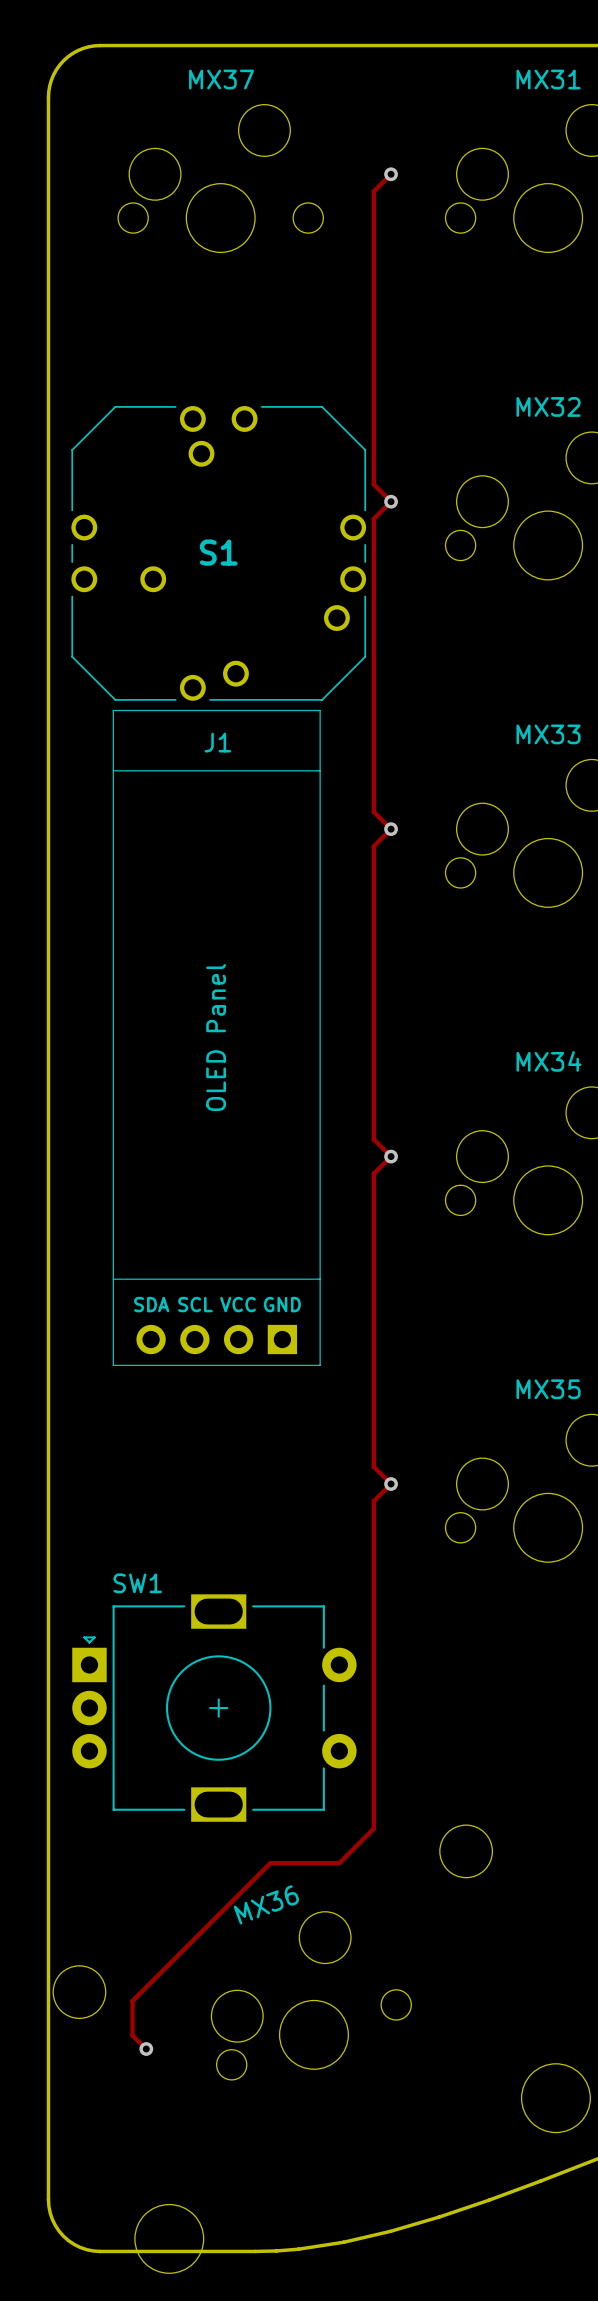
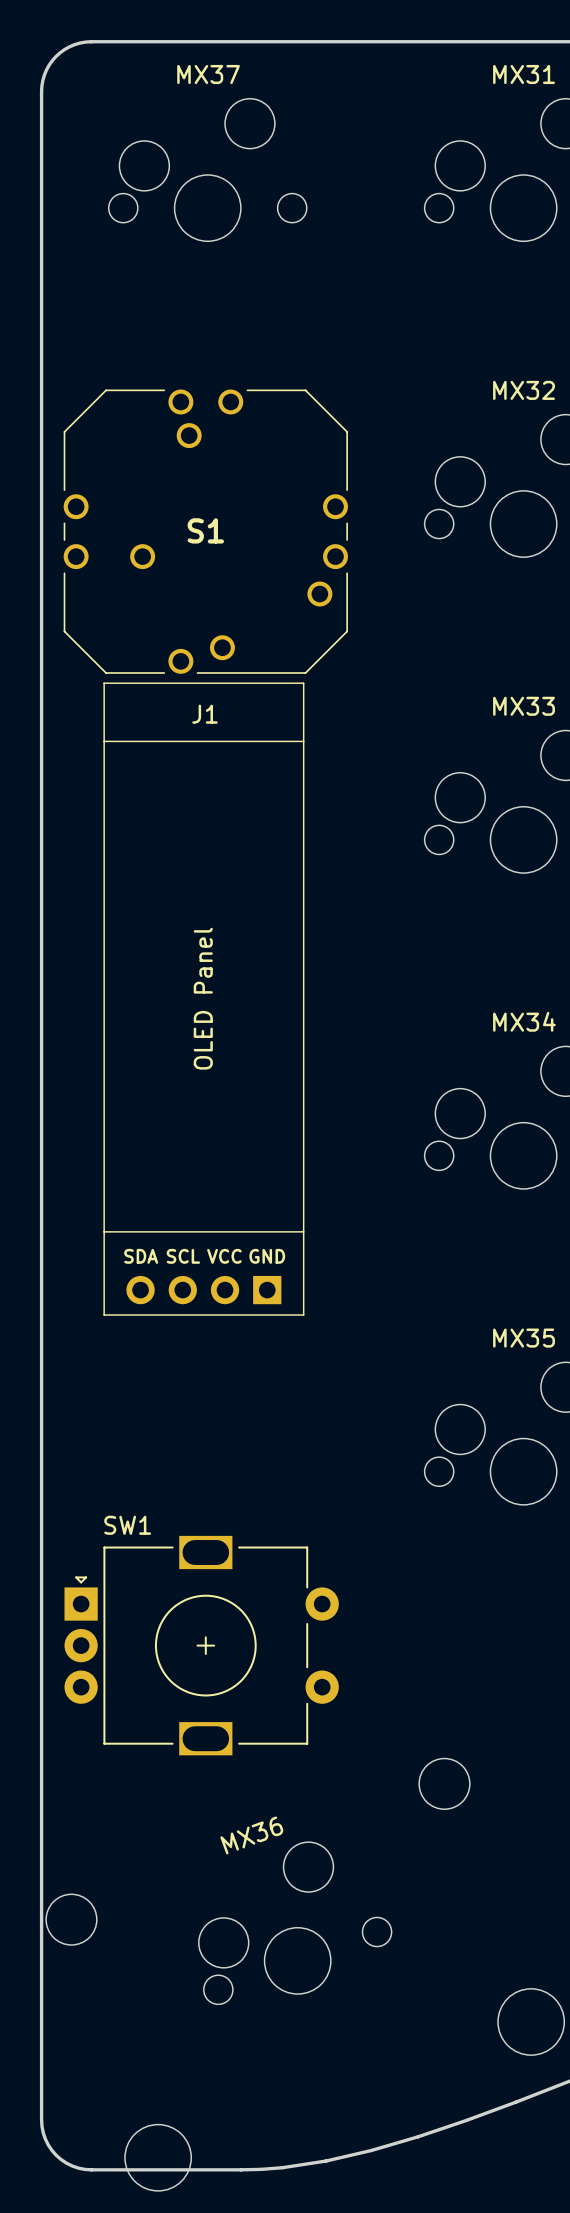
track: (391, 174) (373, 191) (373, 484) (391, 501) (373, 518) (373, 811) (391, 829) (373, 846) (373, 1139) (391, 1156) (373, 1173) (373, 1466) (391, 1484) (373, 1501) (373, 1828) (339, 1863) (270, 1863) (132, 2001) (132, 2035) (146, 2049) -> none
via: (391, 174) -> none
via: (391, 501) -> none
via: (391, 829) -> none
via: (391, 1156) -> none
via: (391, 1484) -> none
via: (146, 2049) -> none

